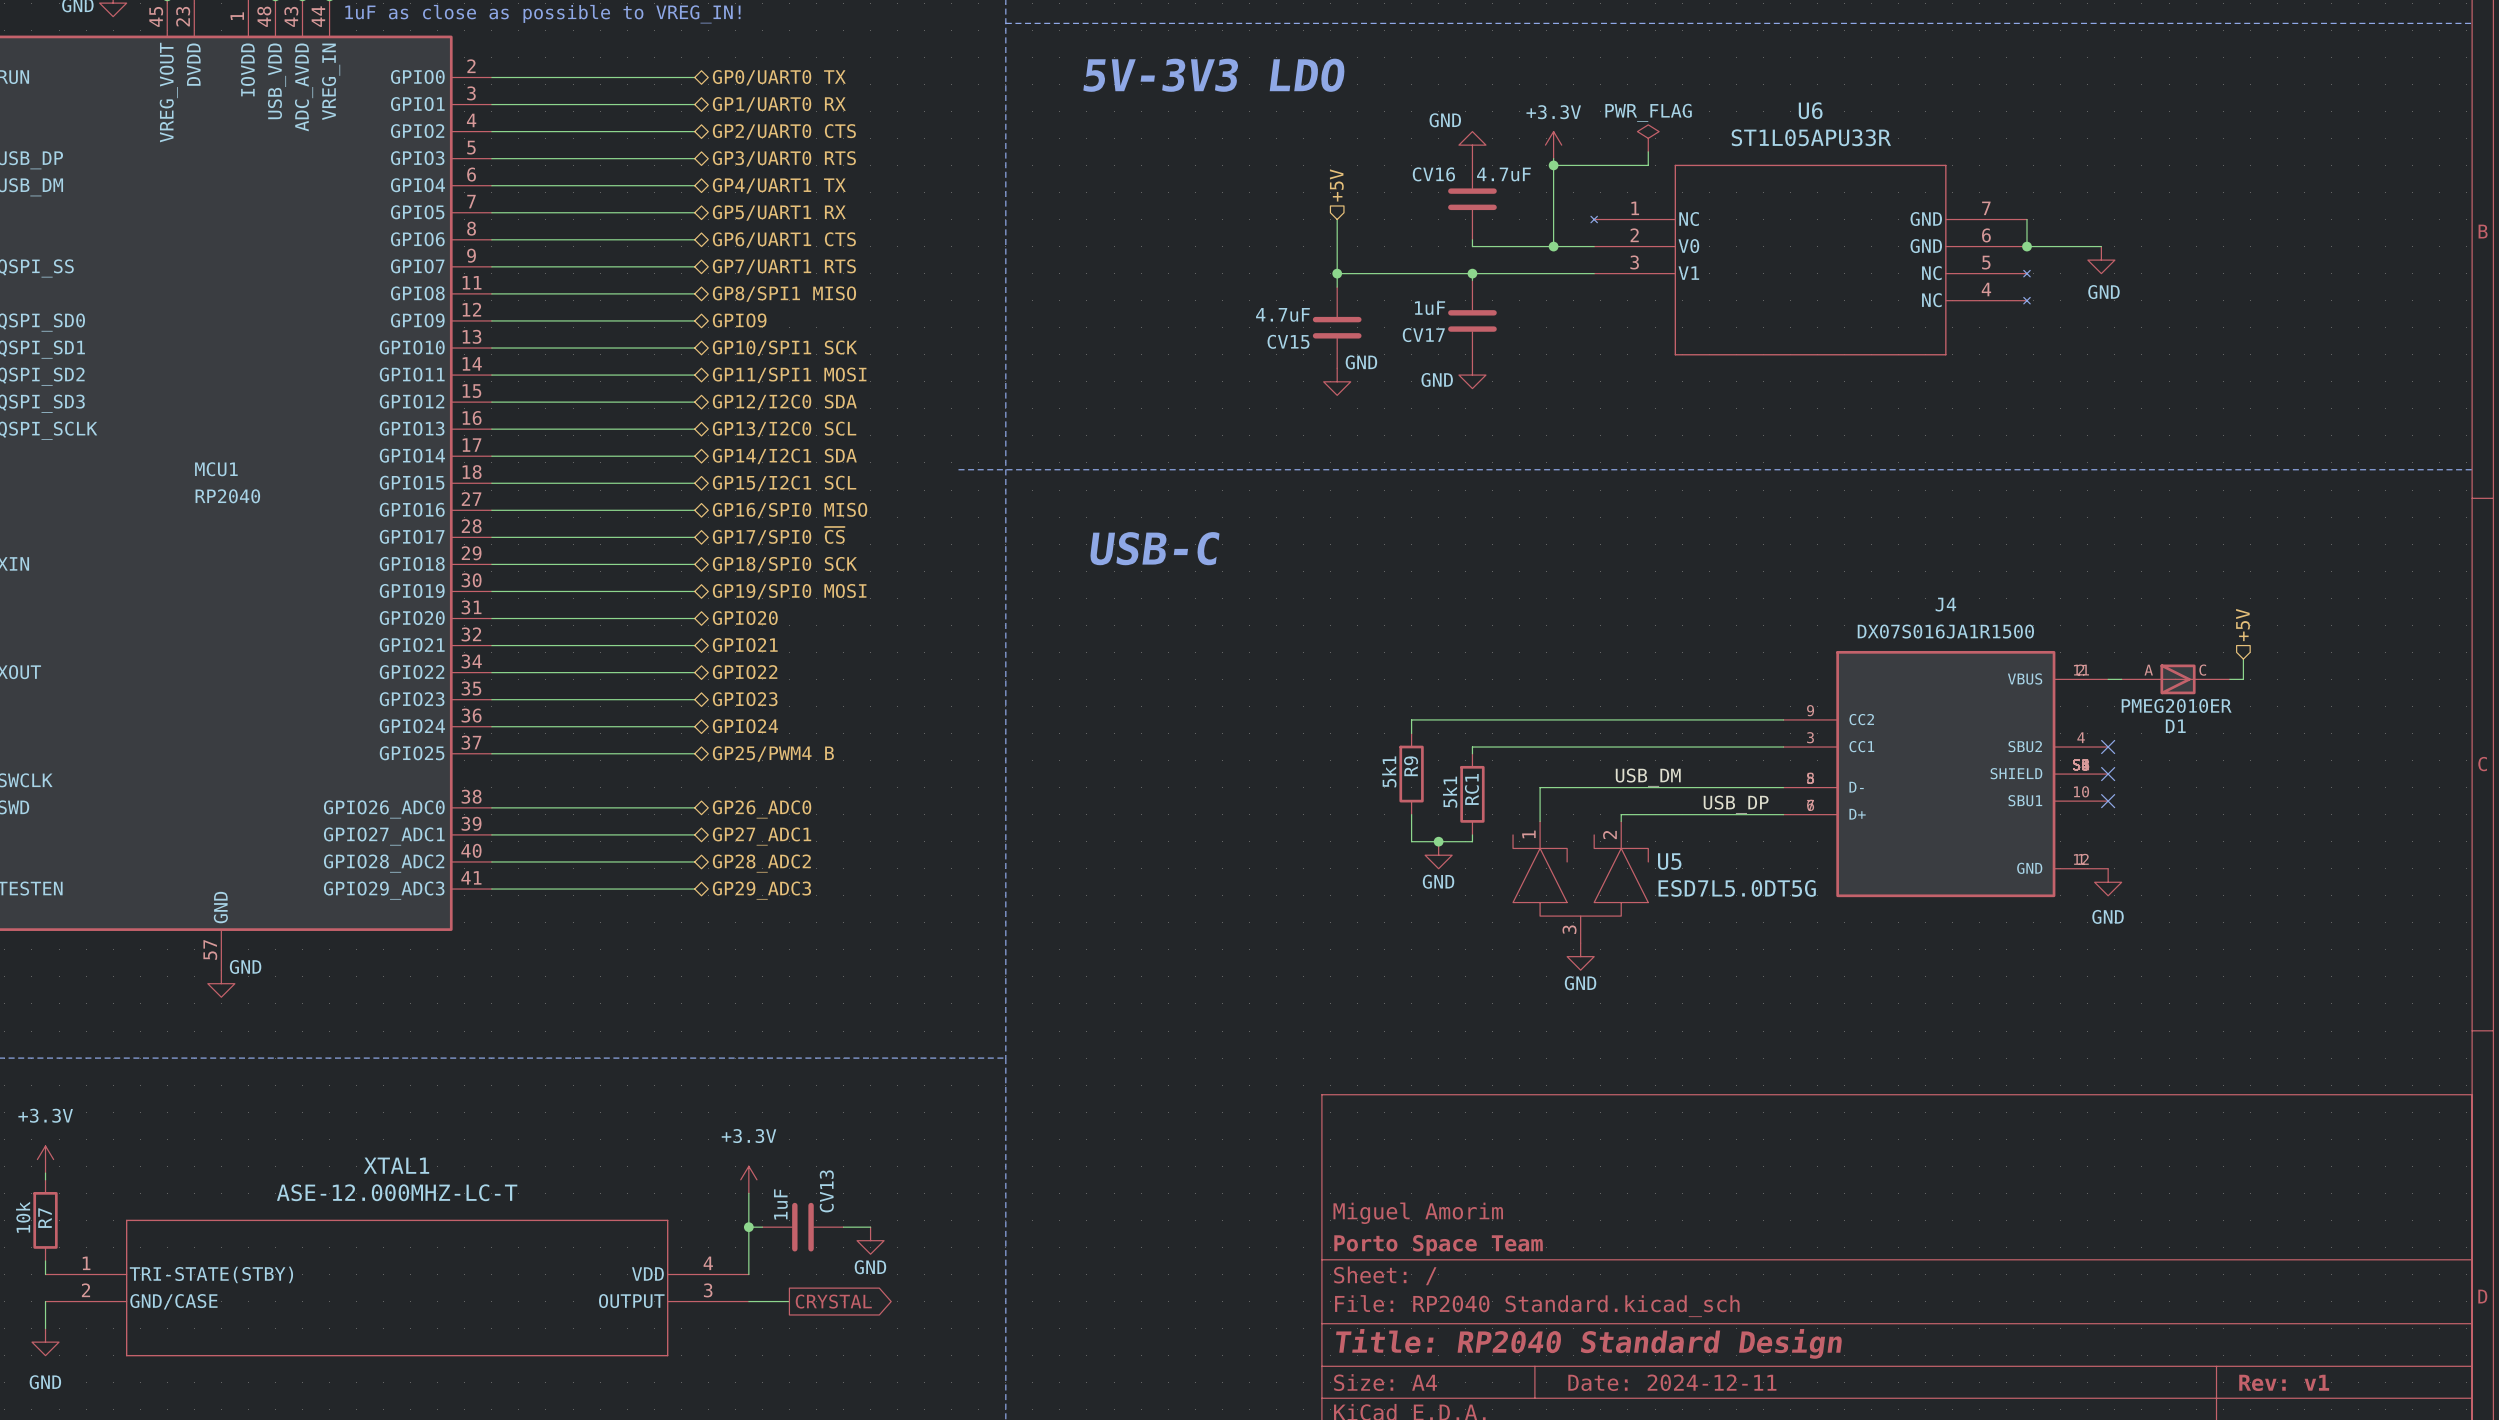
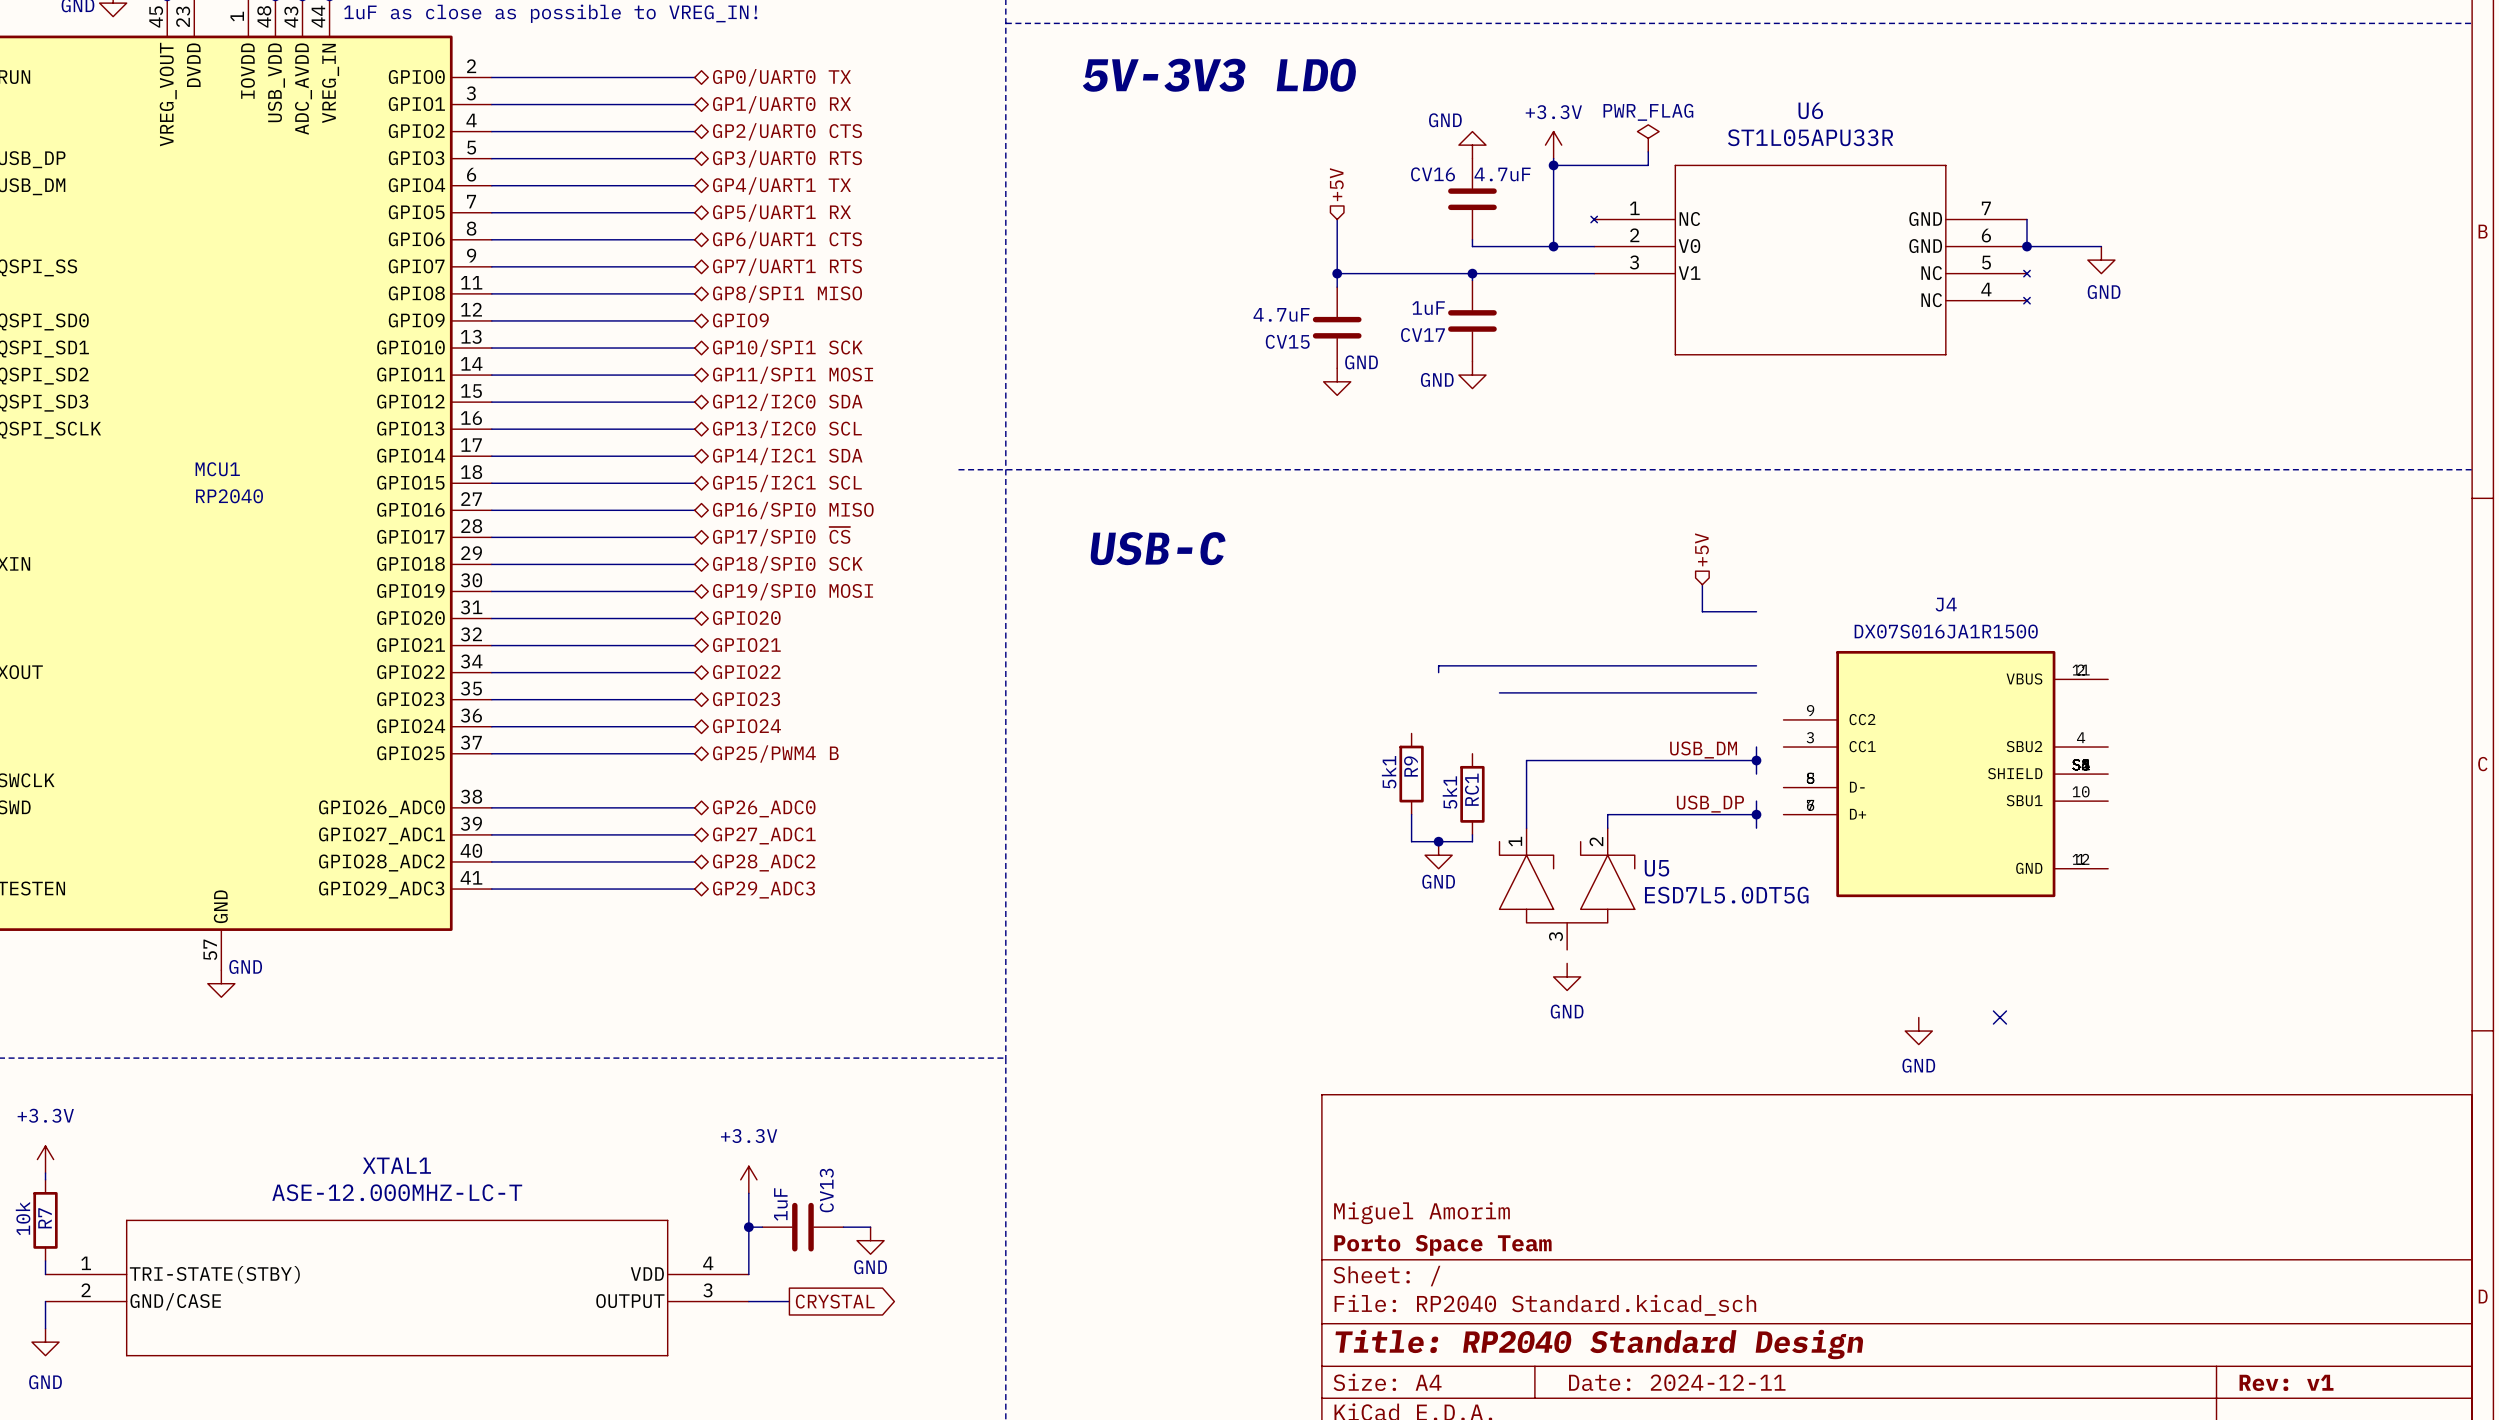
hierarchical label: none -> +5V (1701, 549)
wire: none -> (1702, 584) (1702, 611) (1756, 611)
hierarchical label: +5V (2243, 625) -> none
wire: (2243, 659) (2243, 679) (2229, 679) -> none
wire: none -> (1756, 665) (1438, 665) (1438, 672)
wire: (2108, 679) (2121, 679) -> none
D1: PMEG2010ER (2175, 679) -> none
wire: none -> (1499, 692) (1756, 692)
wire: (1783, 719) (1411, 719) (1411, 733) -> none
wire: none -> (1756, 747) (1756, 774)
wire: (1783, 747) (1472, 747) (1472, 753) -> none
no-connect mark: (2108, 747) -> none
wire: none -> (1756, 760) (1526, 760) (1526, 828)
junction: none -> (1756, 760)
no-connect mark: (2108, 774) -> none
label position: USB_DM (1648, 777) -> USB_DM (1703, 749)
wire: (1783, 787) (1540, 787) (1540, 821) -> none
wire: none -> (1756, 801) (1756, 828)
no-connect mark: (2108, 801) -> none
label position: USB_DP (1736, 804) -> USB_DP (1710, 804)
wire: (1621, 814) (1621, 821) -> (1621, 814) (1607, 814) (1607, 828)
wire: (1756, 814) (1783, 814) -> none
junction: none -> (1756, 814)
U5 position: (1580, 882) -> (1567, 889)
power symbol: GND (2108, 882) -> none
power symbol position: GND (1580, 956) -> GND (1567, 976)
power symbol text position: GND (1580, 983) -> GND (1567, 1011)
no-connect mark: none -> (1999, 1017)
power symbol: none -> GND (1918, 1031)

